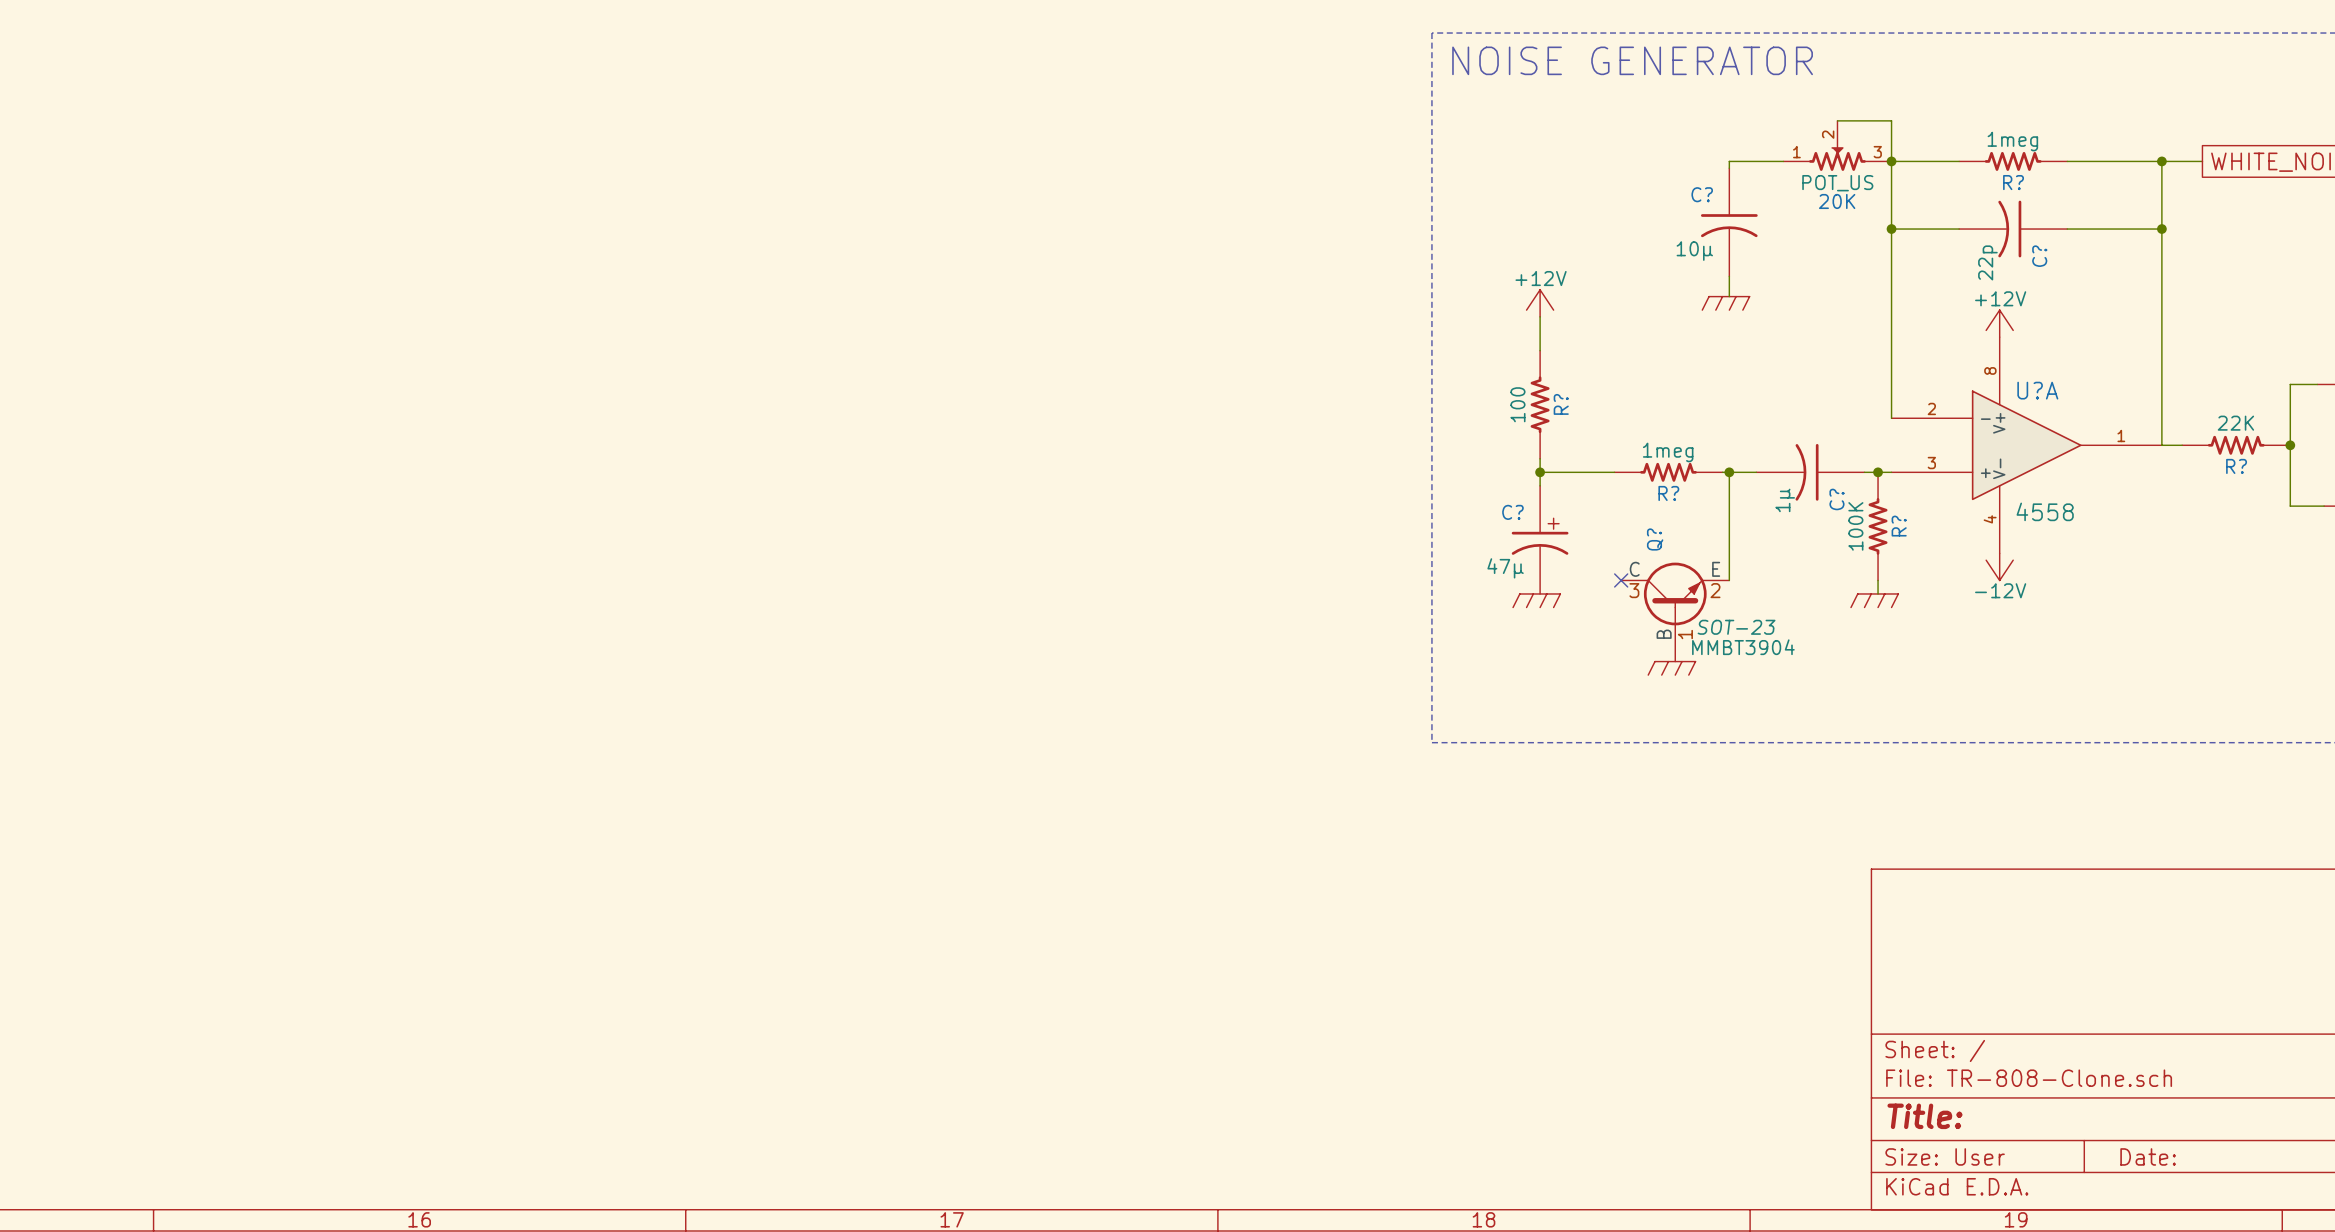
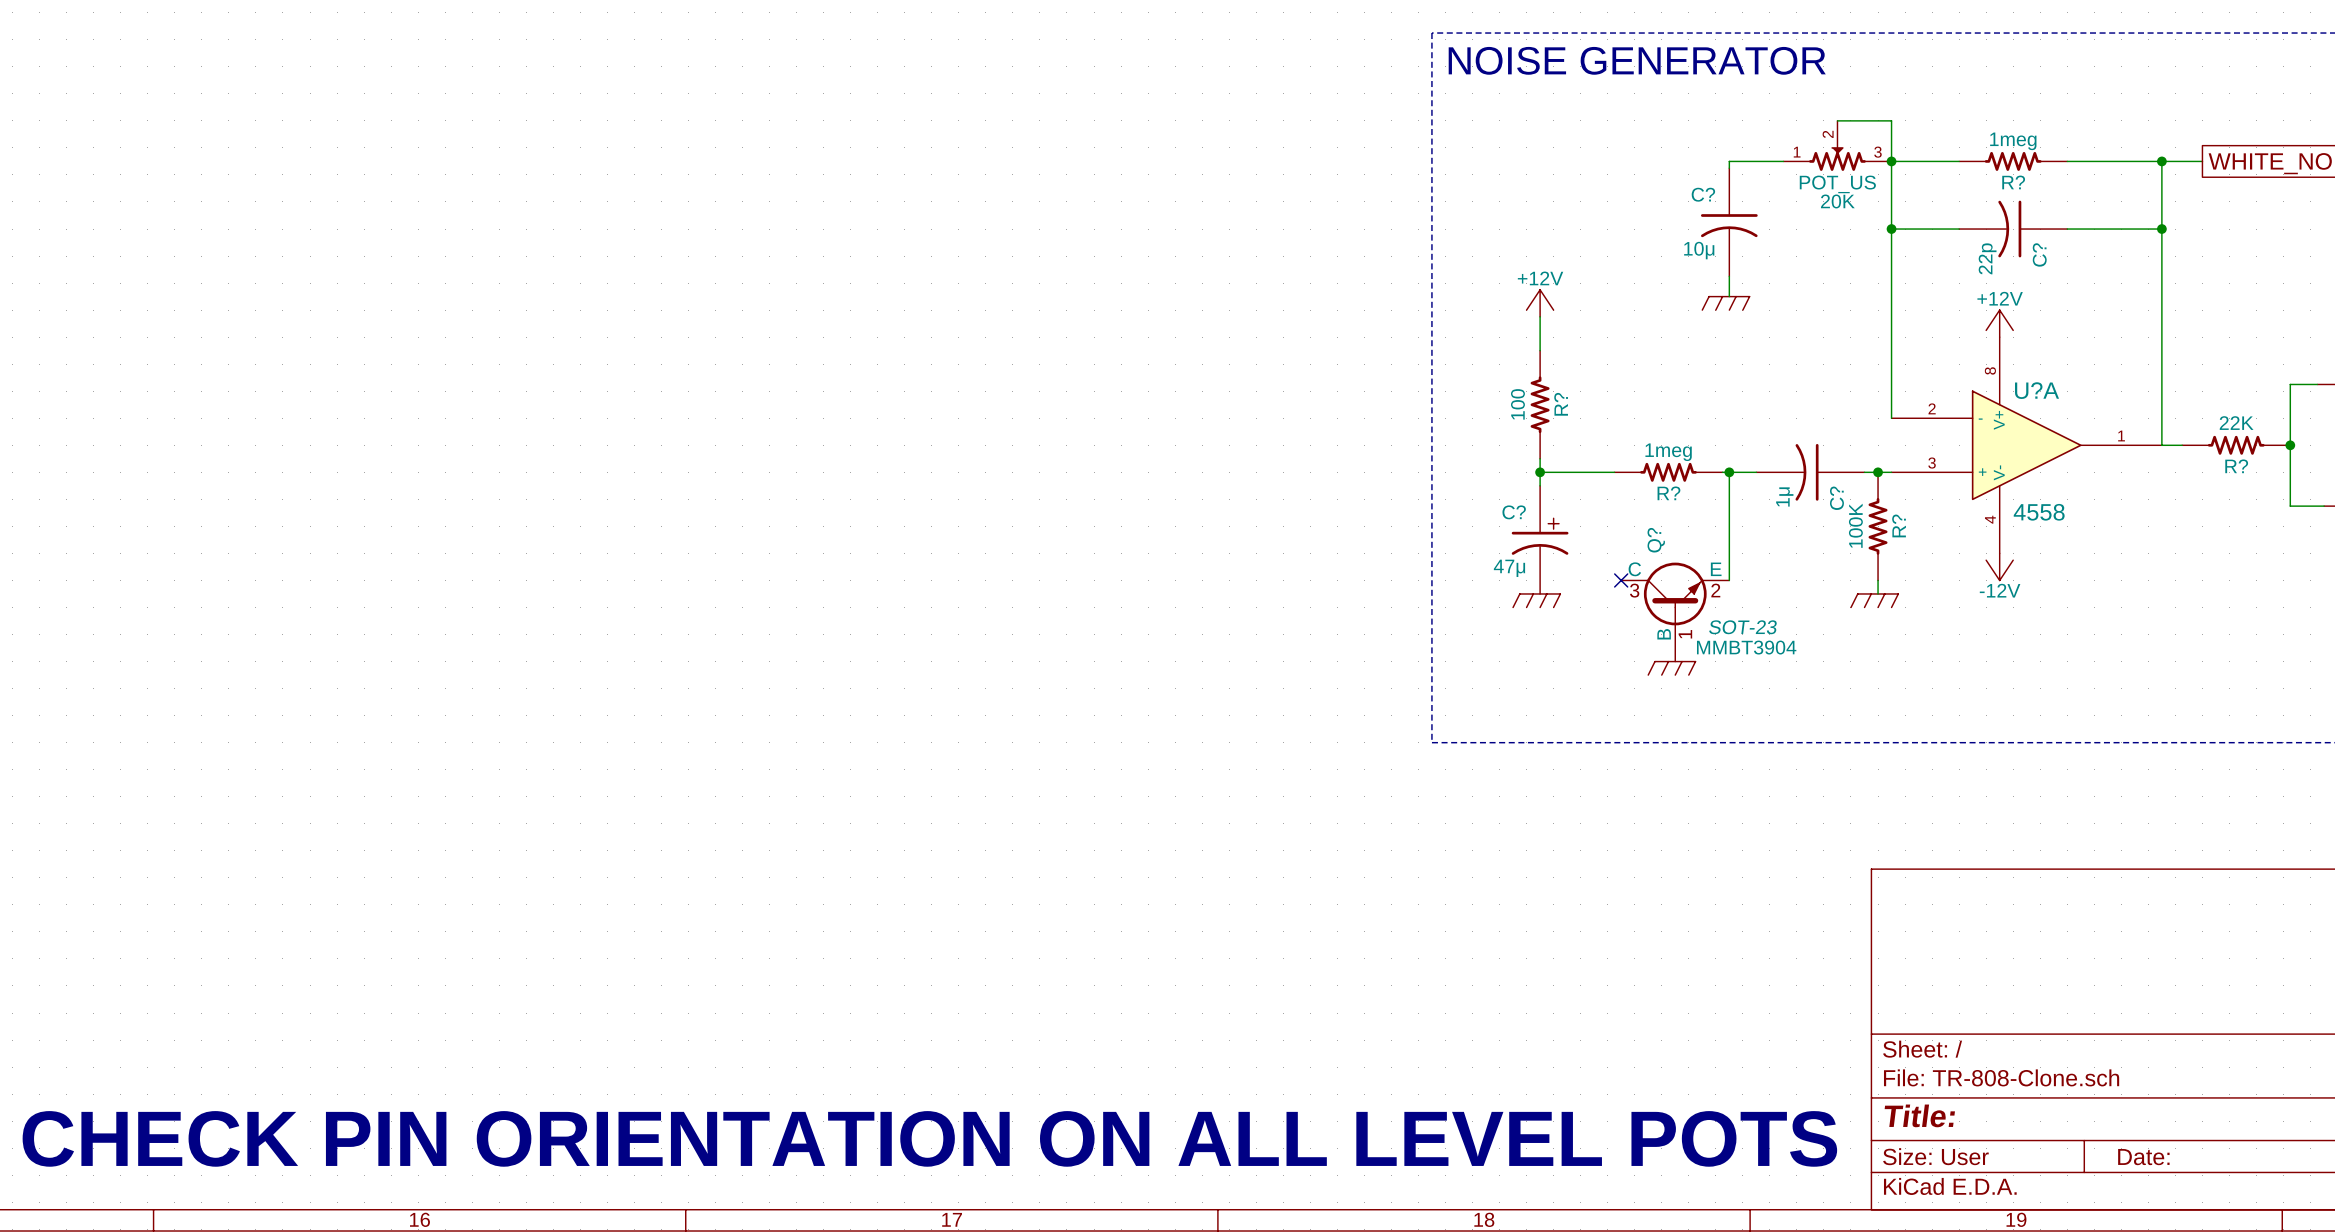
text: none -> CHECK PIN ORIENTATION ON ALL LEVEL POTS (929, 1138)

